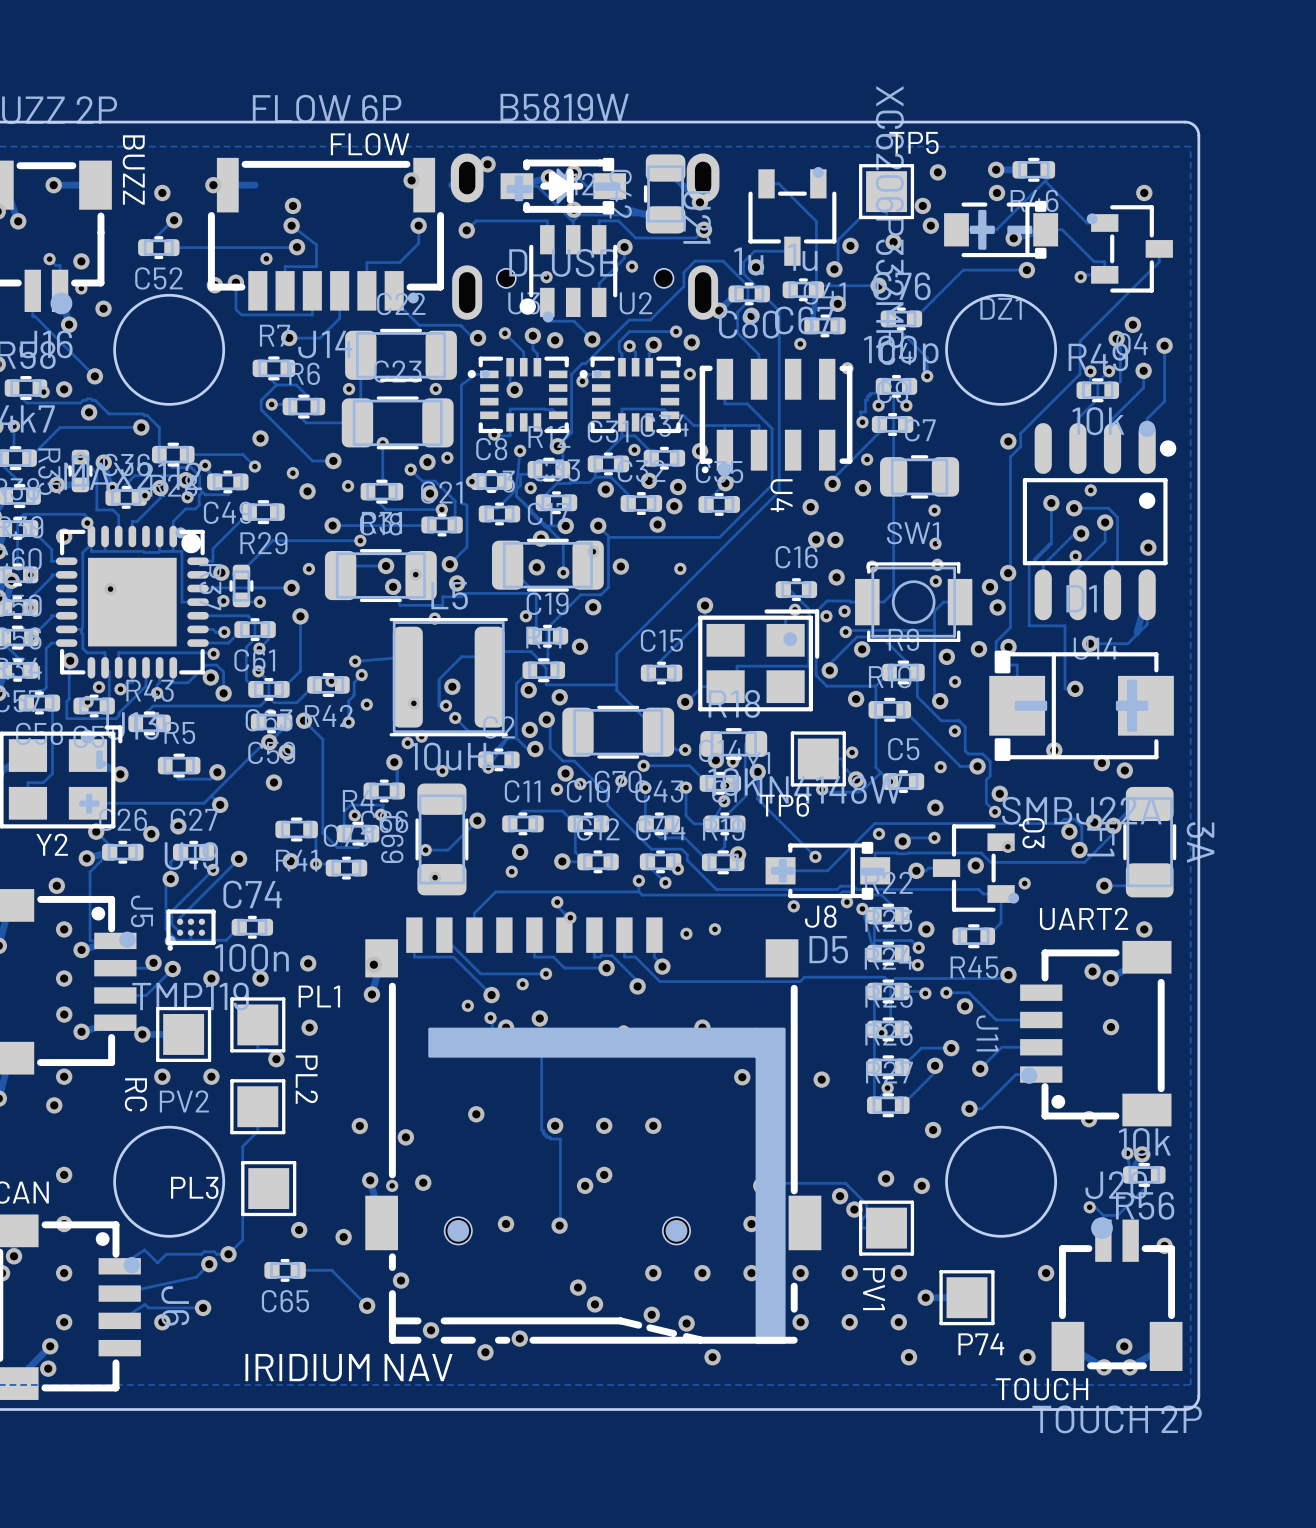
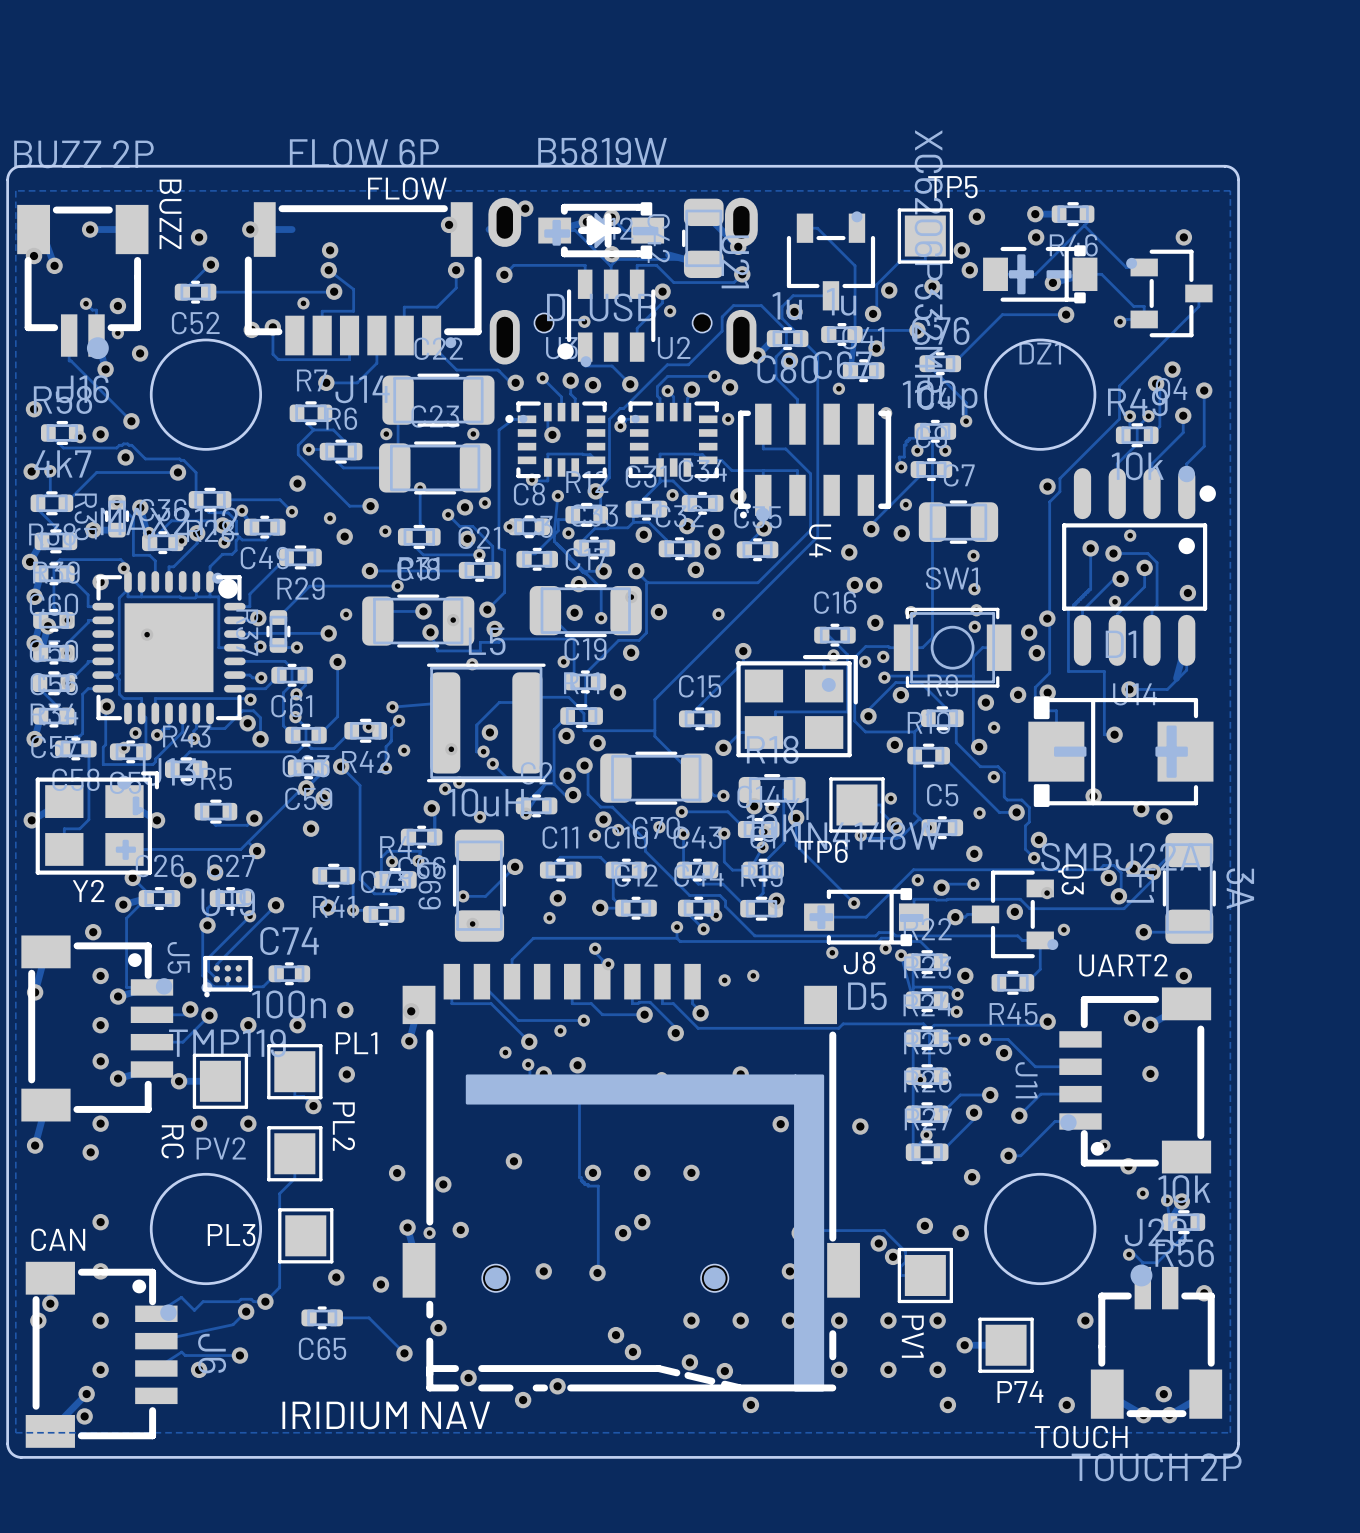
via: none -> (1104, 1145)
via: none -> (1142, 1193)

